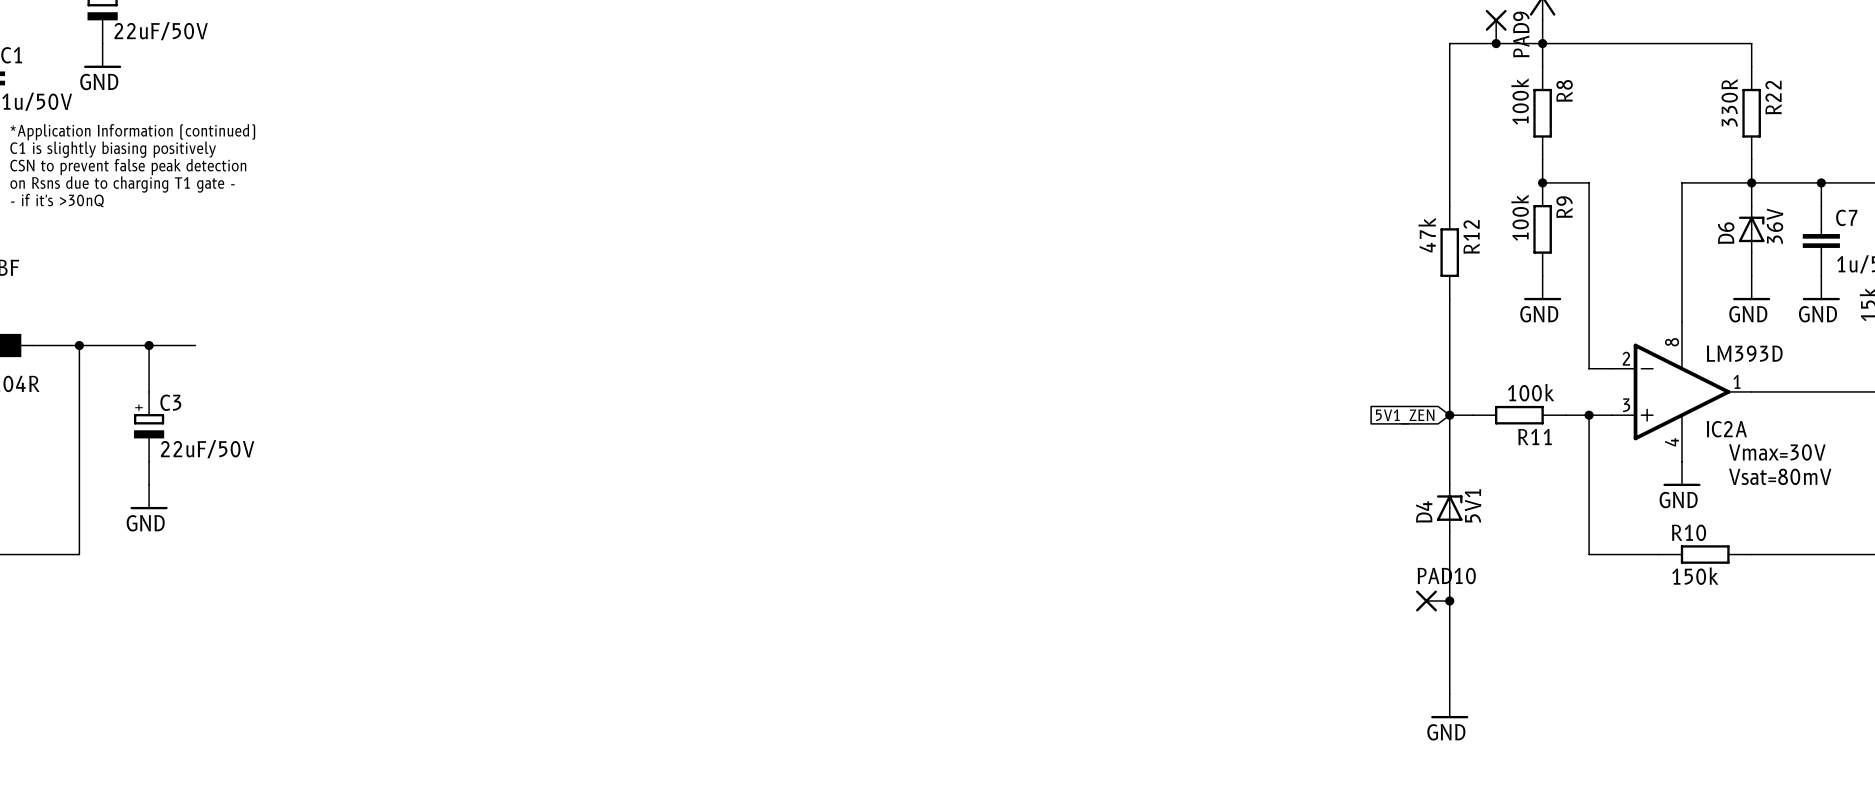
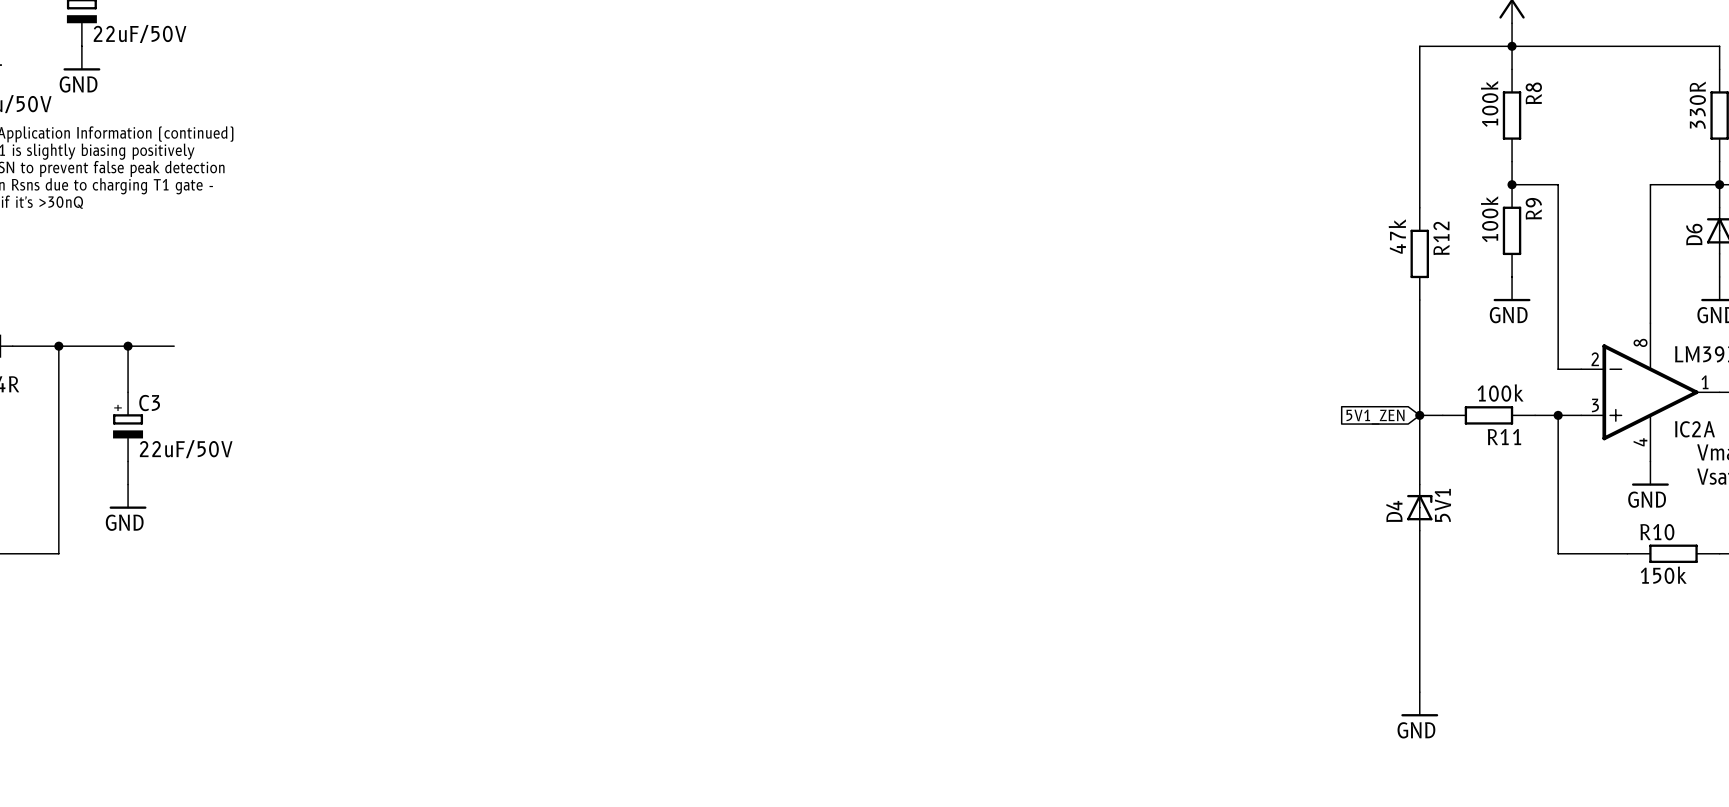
PAD9: (1496, 26) -> none
junction: (1496, 43) -> none
PAD10: (1432, 601) -> none
junction: (1449, 601) -> none

